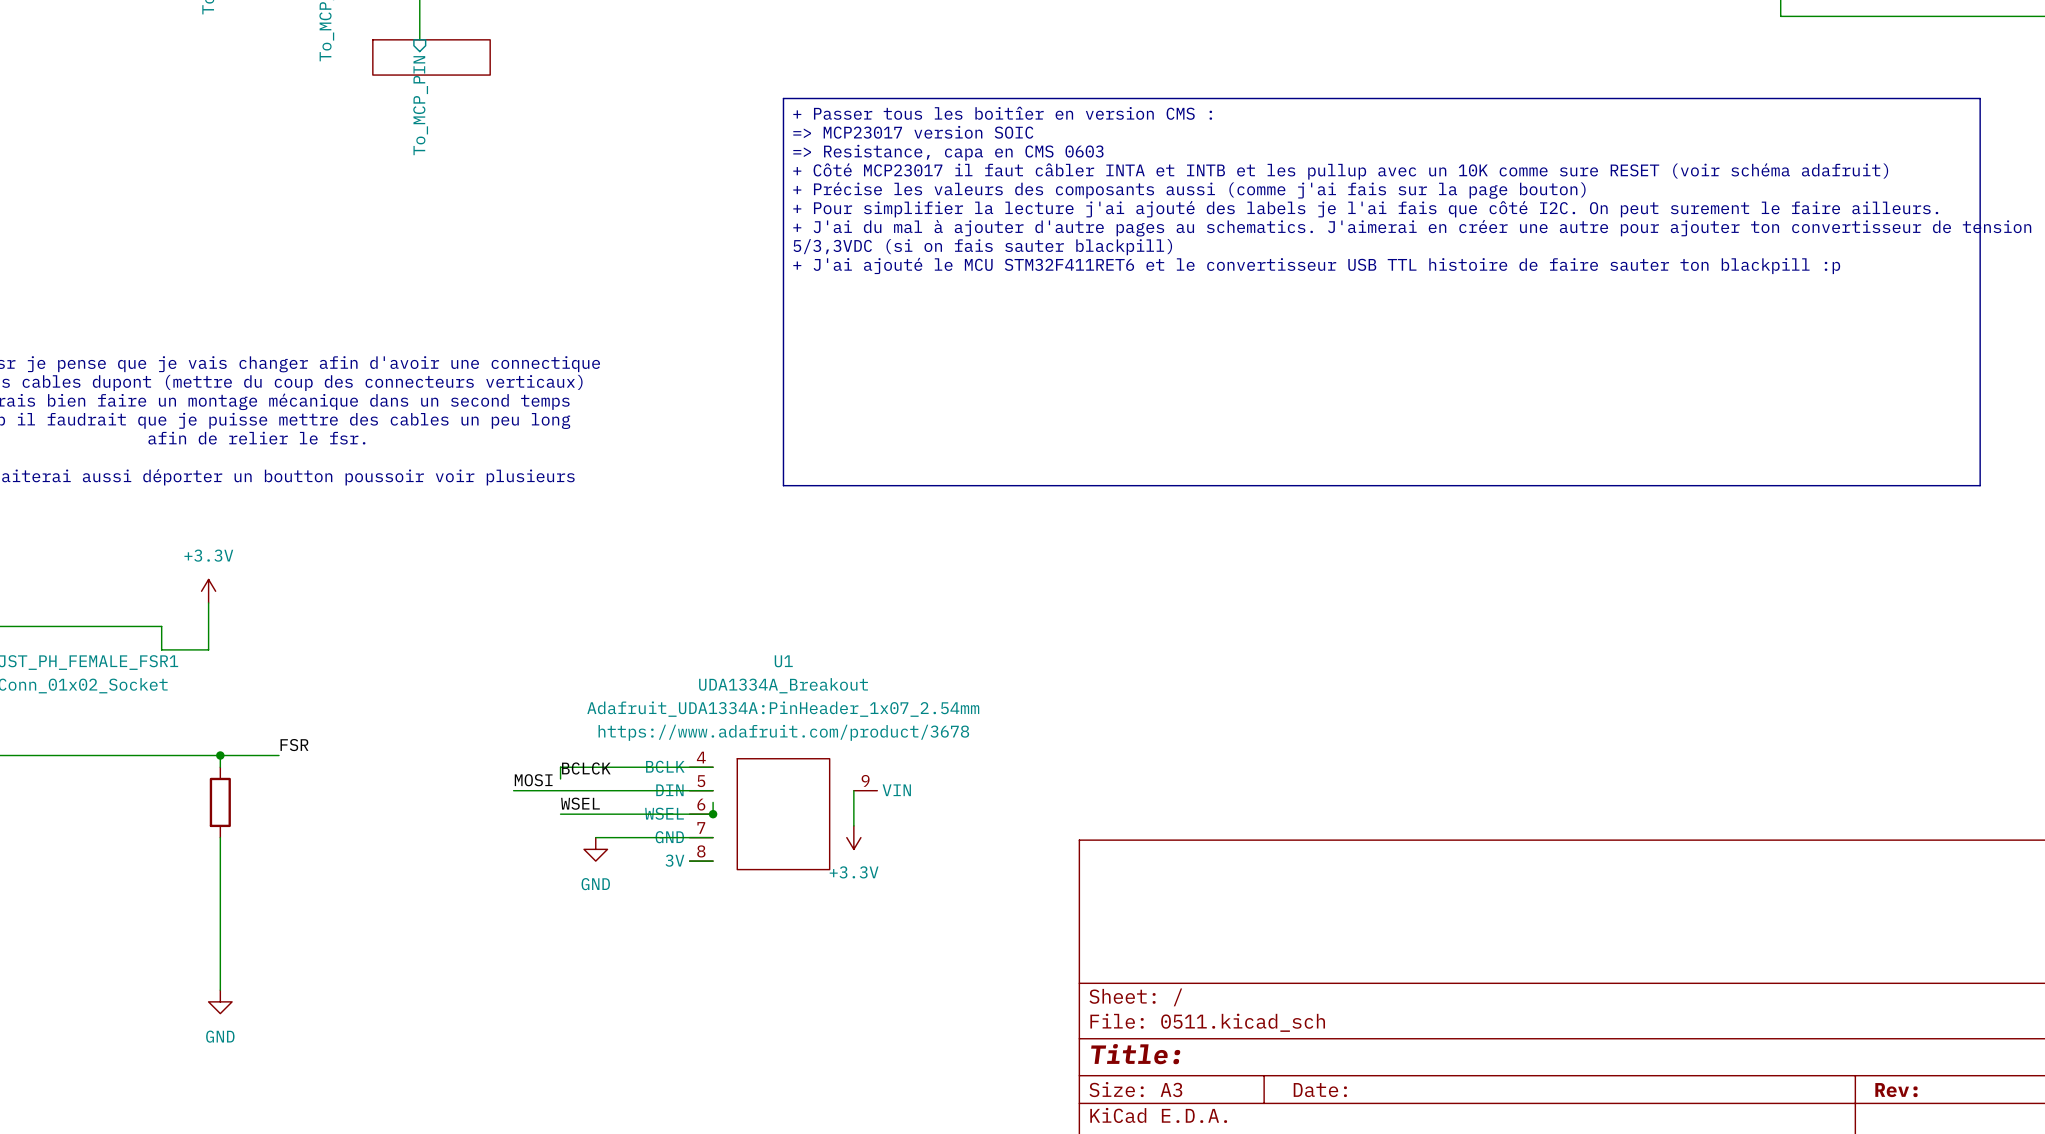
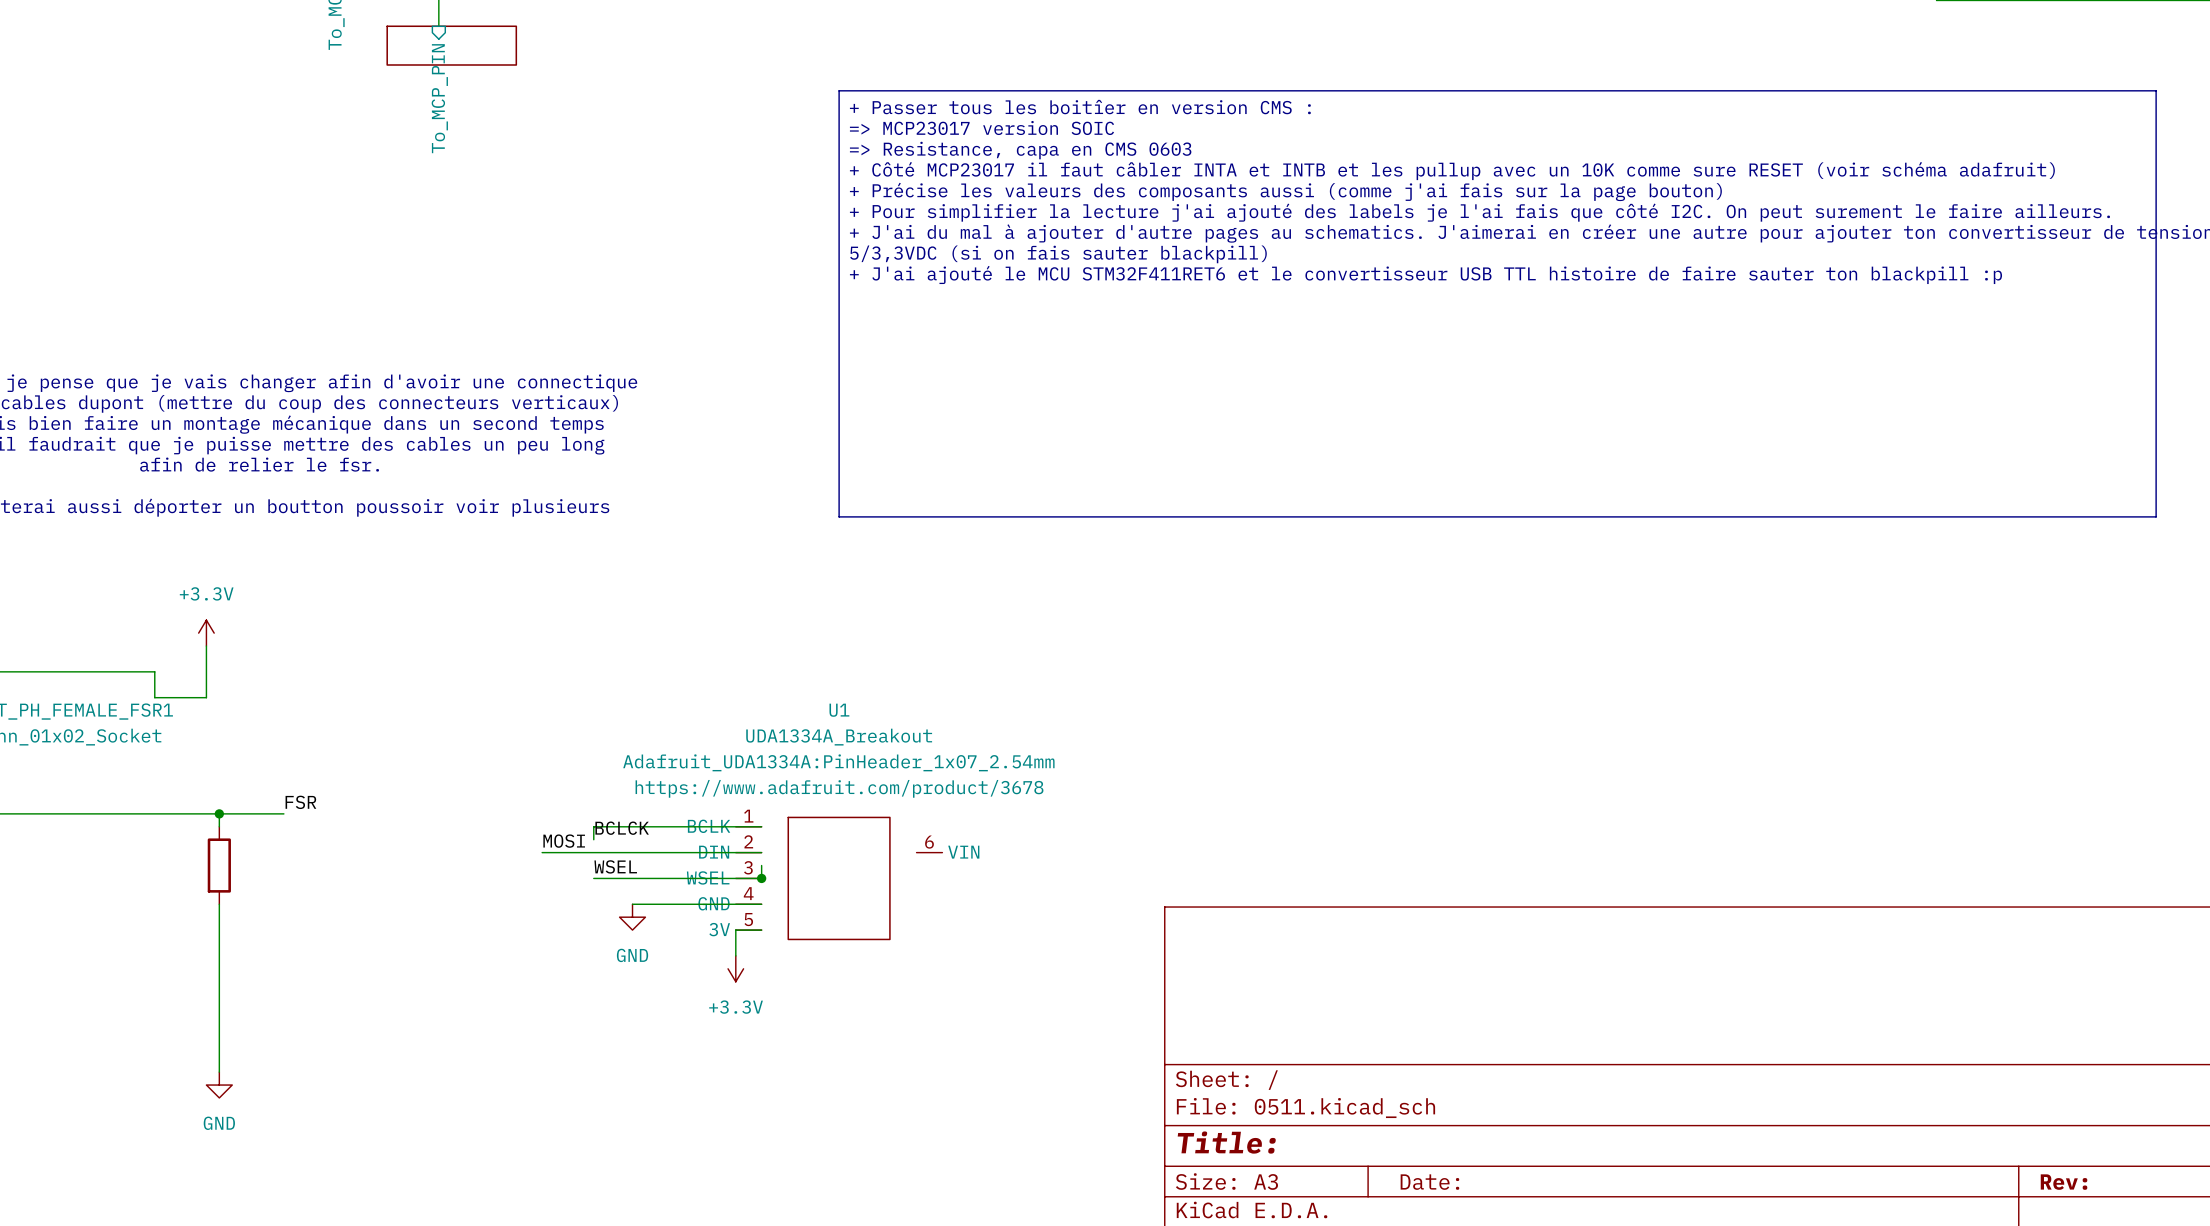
U1 pin number: 4 (701, 757) -> 1 (748, 816)
U1 pin number: 9 (865, 780) -> 6 (929, 842)
U1 pin number: 5 (701, 781) -> 2 (748, 841)
wire: (853, 790) (853, 825) -> none
U1 pin number: 6 (701, 804) -> 3 (748, 867)
U1 pin number: 7 (701, 827) -> 4 (748, 893)
power symbol position: +3.3V (853, 837) -> +3.3V (735, 968)
U1 pin number: 8 (701, 851) -> 5 (748, 919)
wire: none -> (735, 930) (735, 955)

